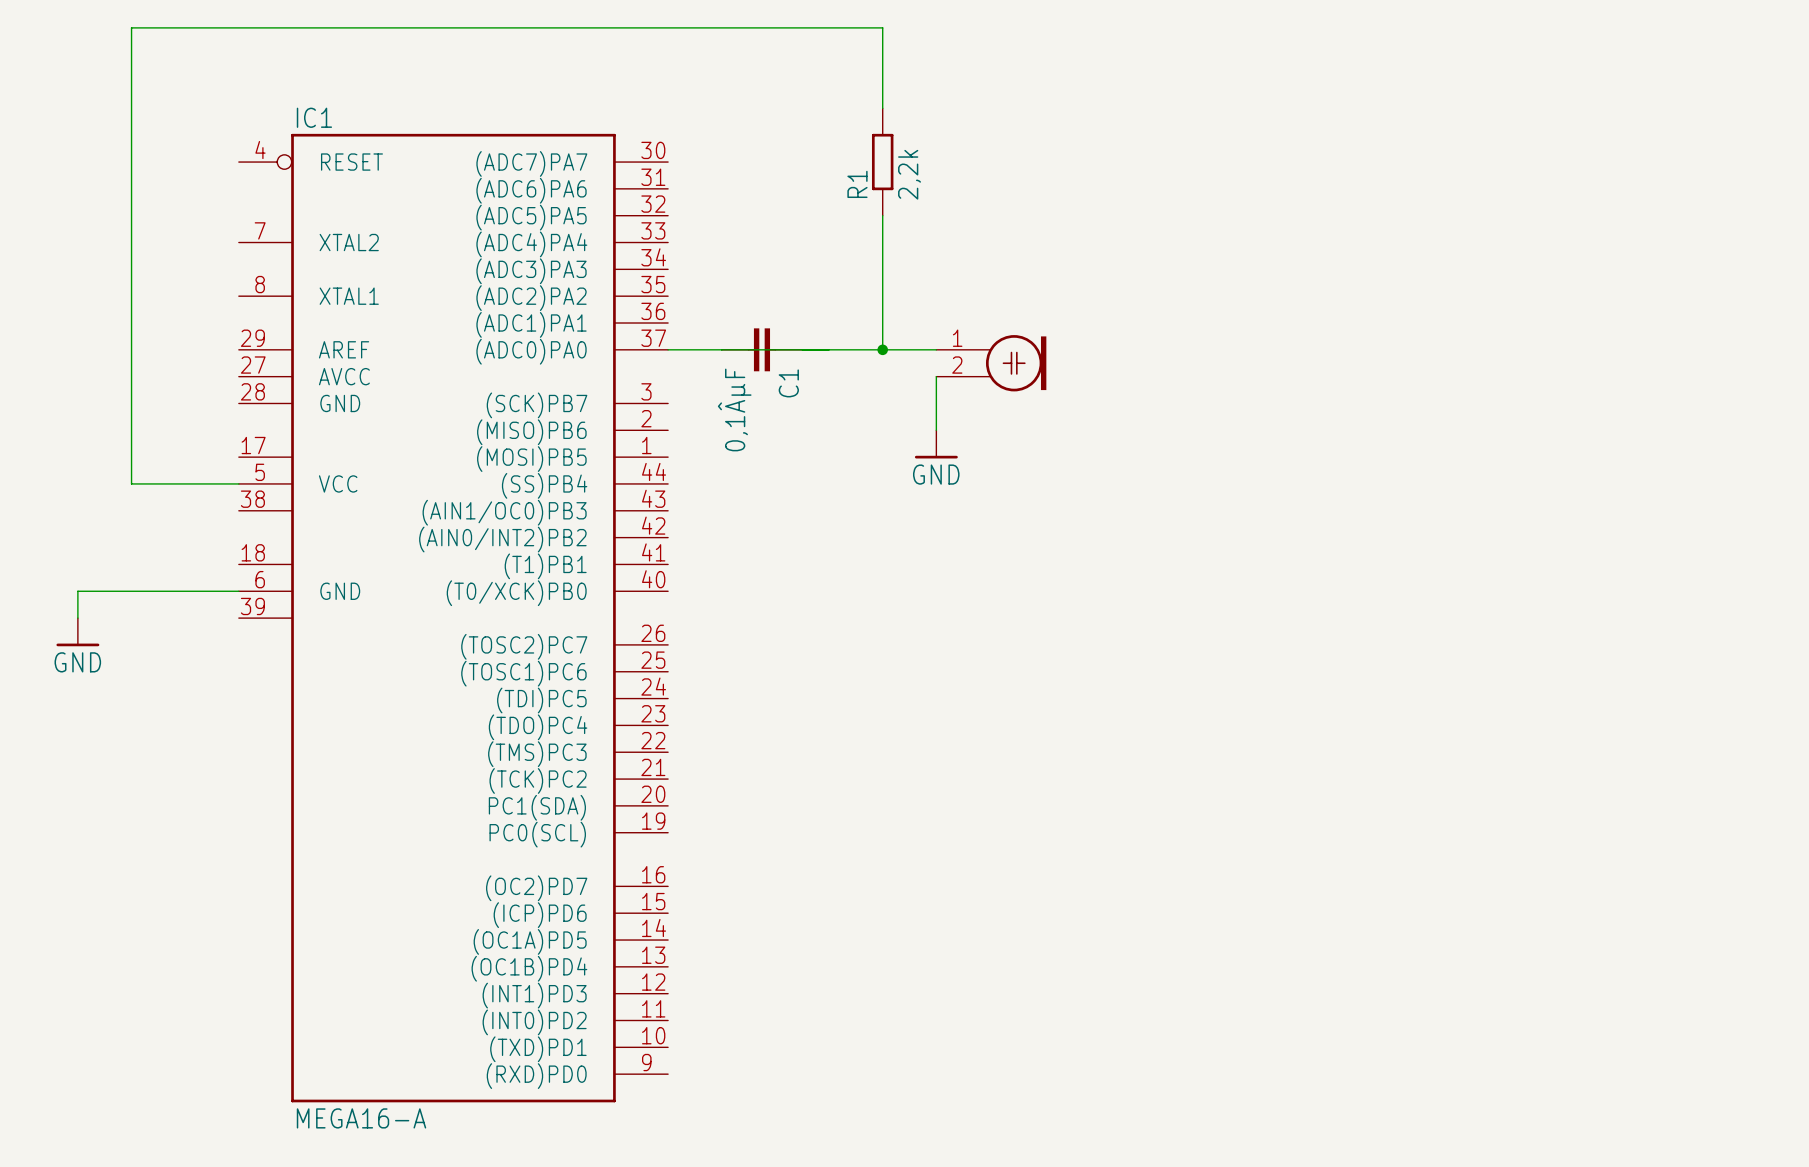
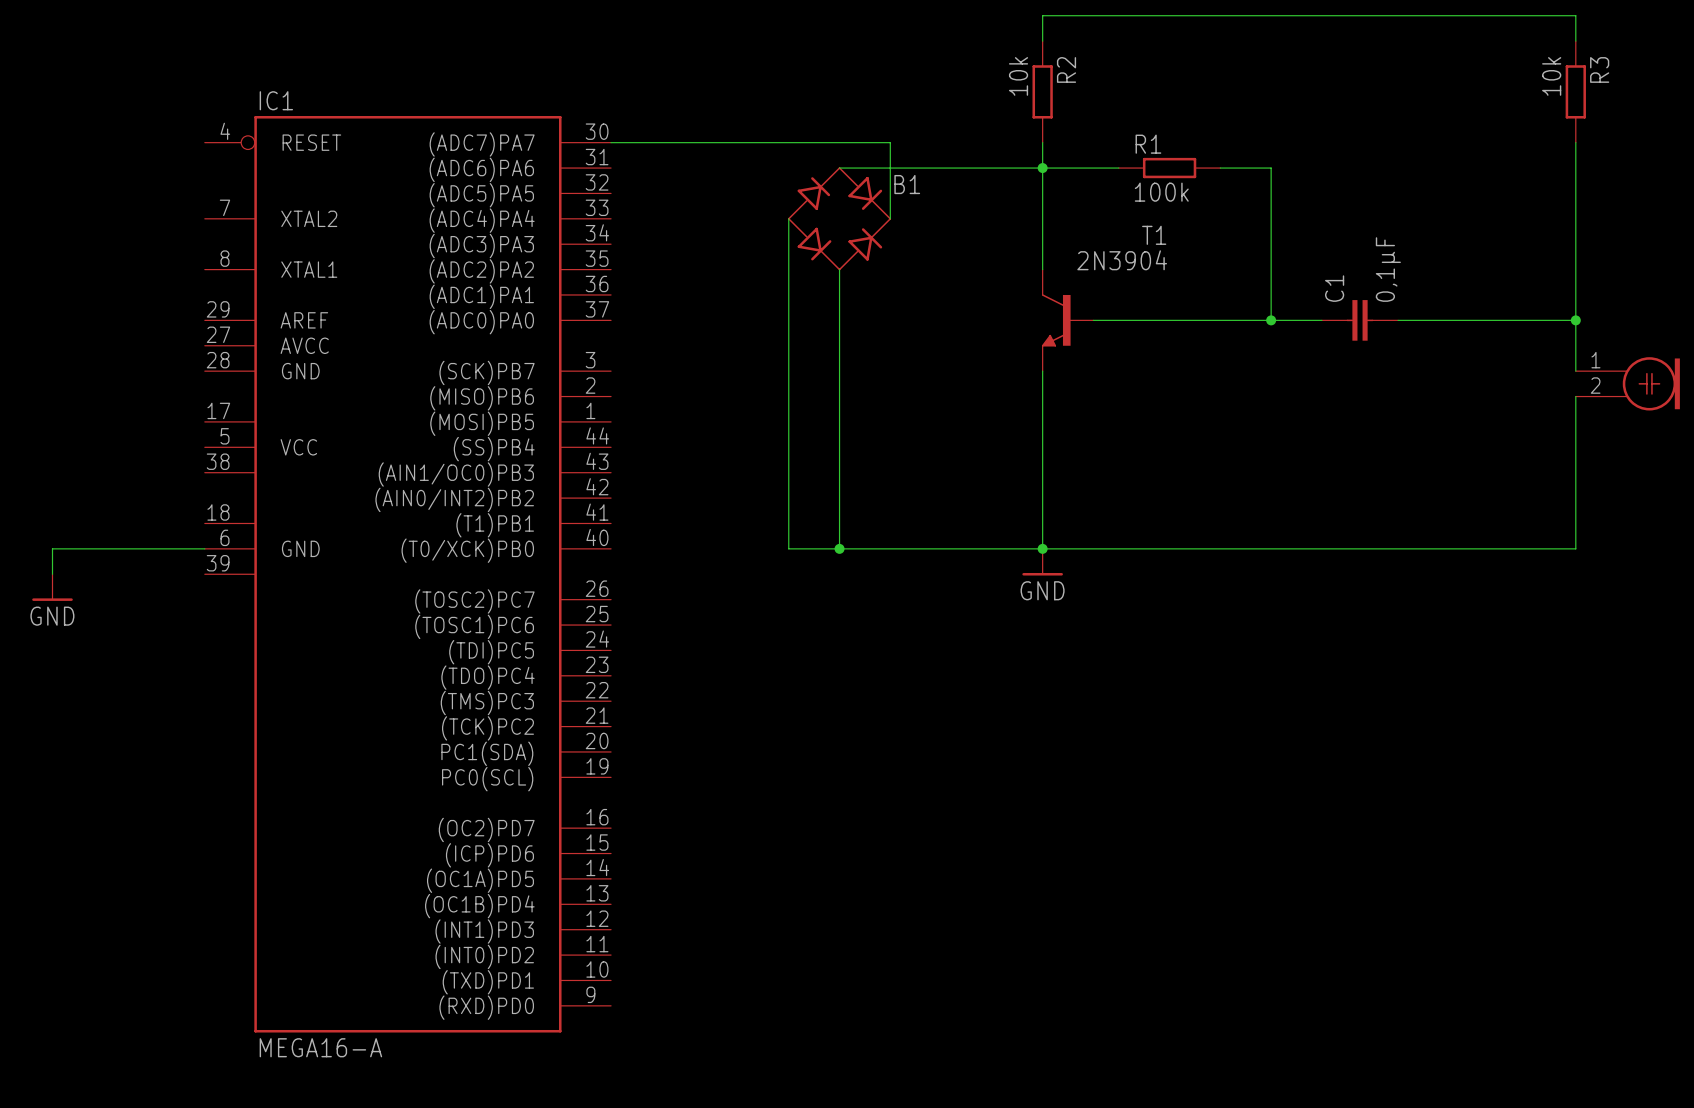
wire: none -> (1042, 41) (1042, 15) (1575, 15) (1575, 41)
wire: (882, 108) (882, 27) (131, 27) (131, 483) (238, 483) -> none
R2: none -> 10k (1042, 91)
R3: none -> 10k (1575, 91)
wire: none -> (611, 142) (890, 142) (890, 218)
R1 rotation: 0° (882, 162) -> 90° clockwise (1169, 168)
R1 position: (882, 162) -> (1169, 168)
wire: none -> (1575, 142) (1575, 371)
R1 value: 2,2k (909, 174) -> 100k (1161, 192)
wire: none -> (839, 168) (1118, 168)
junction: none -> (1042, 168)
wire: none -> (1220, 168) (1271, 168) (1271, 320)
wire: (882, 215) (882, 349) -> (1042, 142) (1042, 269)
wire: none -> (788, 218) (788, 548) (1575, 548) (1575, 396)
B1: none -> (839, 218)
wire: none -> (839, 269) (839, 548)
wire: (668, 349) (936, 349) -> none
C1 position: (761, 349) -> (1360, 320)
junction: (882, 349) -> none
T1: none -> 2N3904 (1067, 320)
wire: none -> (1093, 320) (1321, 320)
junction: none -> (1271, 320)
wire: none -> (1398, 320) (1575, 320)
junction: none -> (1575, 320)
part: (991, 363) -> none
wire: (936, 376) (936, 430) -> none
C1 name position: C1 (788, 383) -> C1 (1334, 288)
wire: none -> (1042, 371) (1042, 548)
C1 value: 0,1ÂµF (734, 409) -> 0,1µF (1388, 269)
part: none -> (1627, 383)
power symbol position: GND (936, 444) -> GND (1042, 562)
junction: none -> (839, 548)
junction: none -> (1042, 548)

